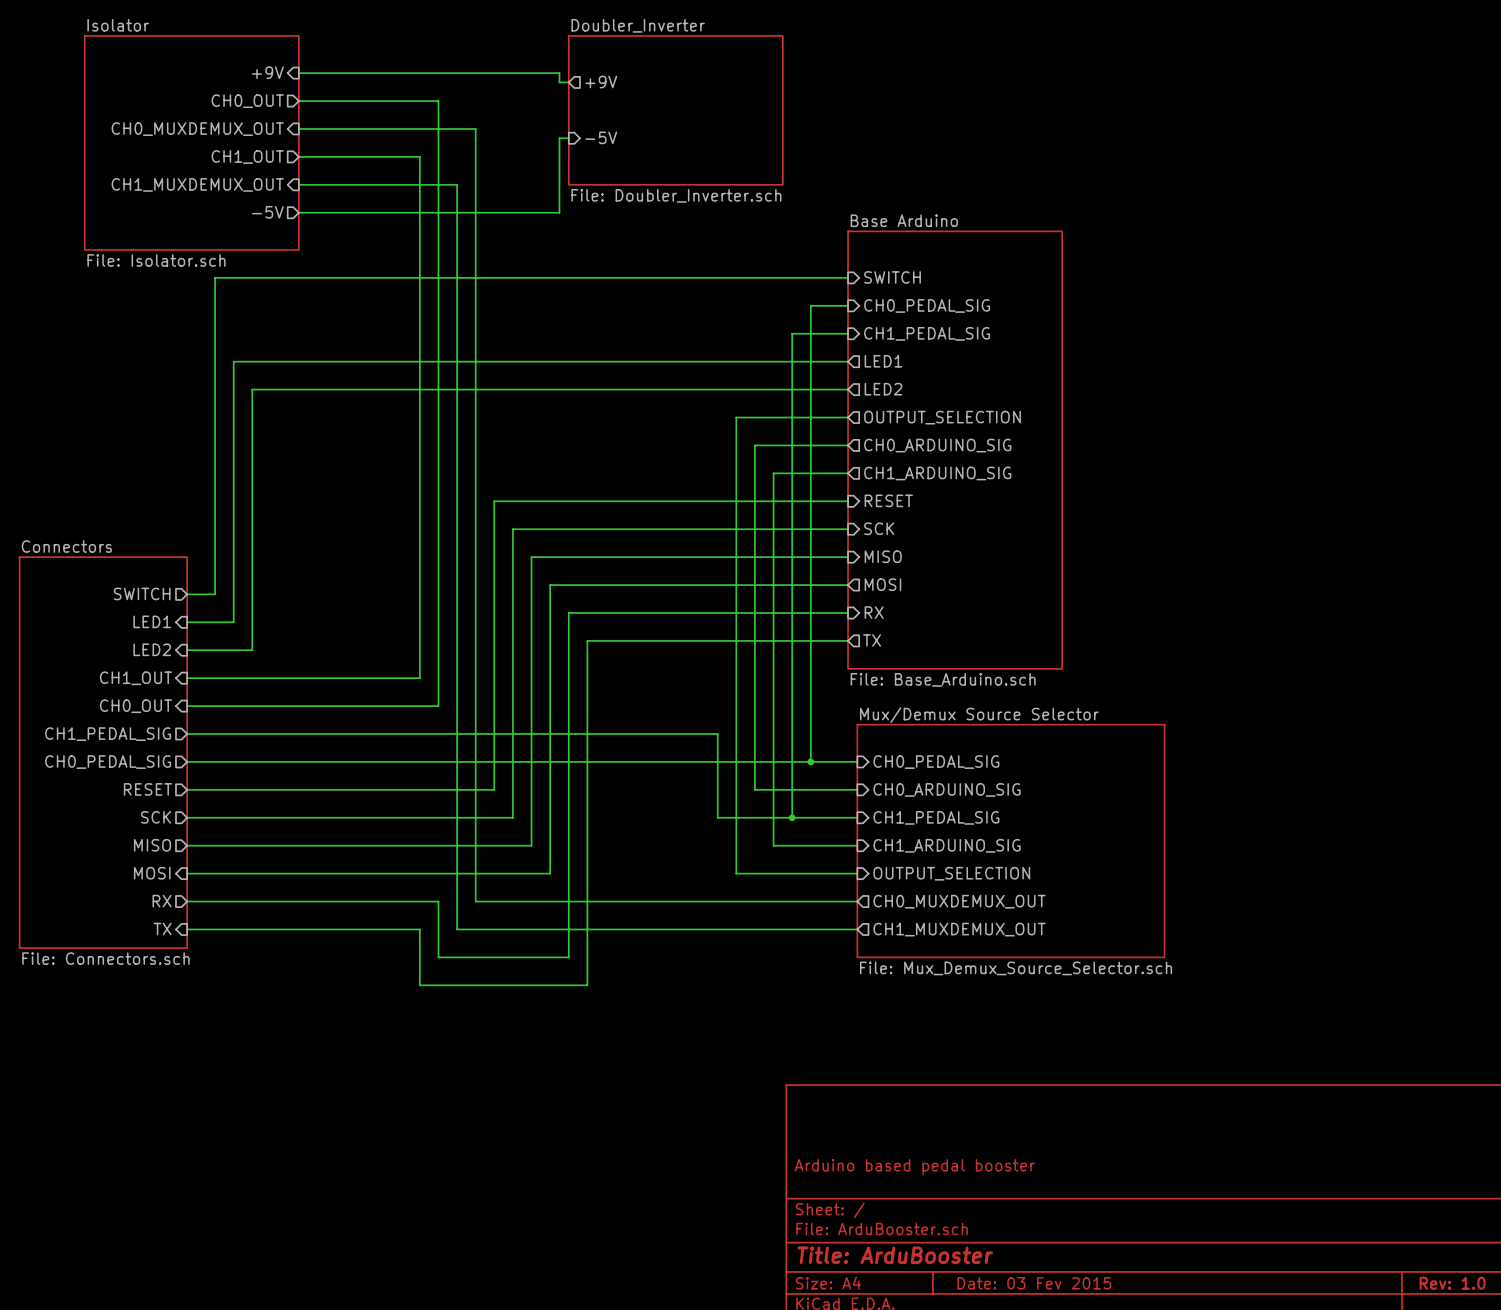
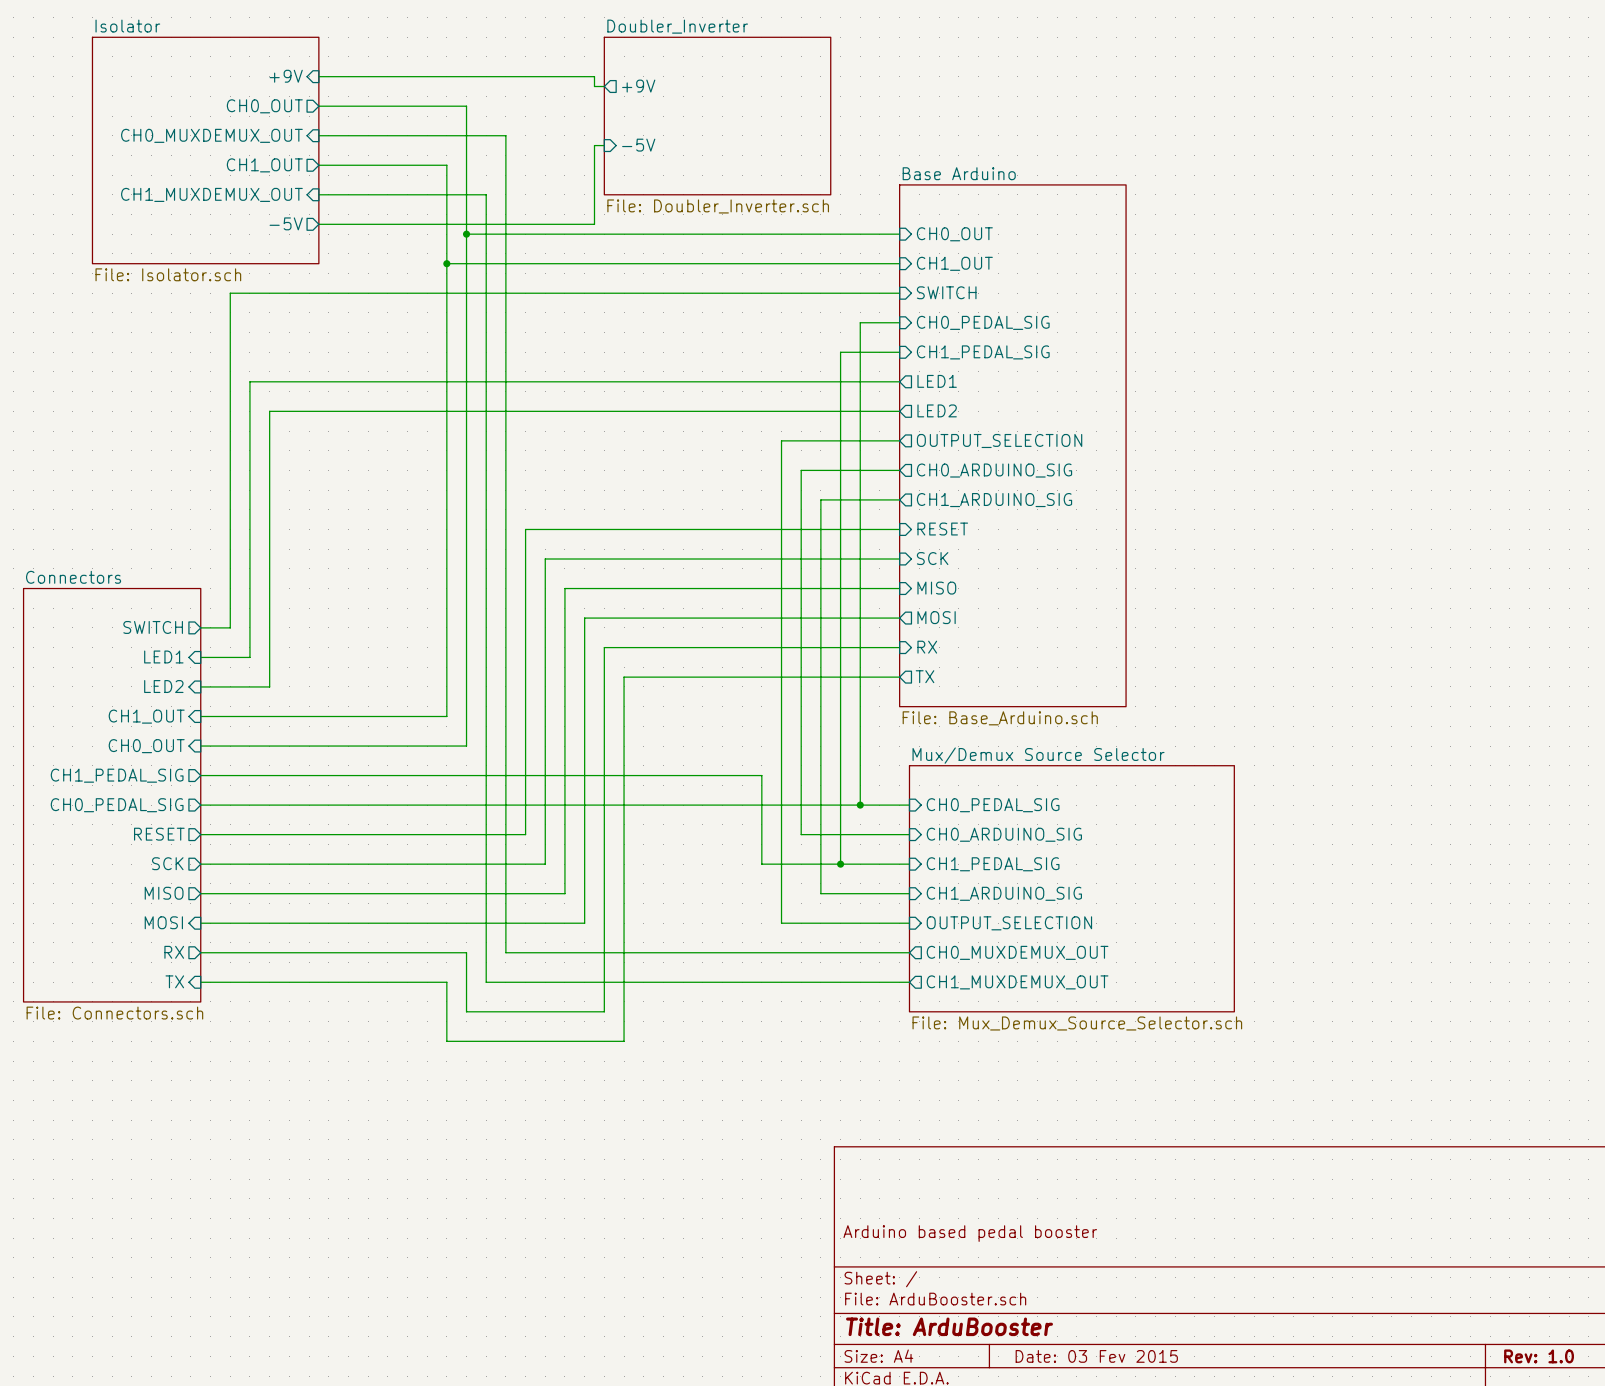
wire: none -> (466, 234) (899, 234)
junction: none -> (466, 234)
sheet pin: none -> CH0_OUT (954, 234)
wire: none -> (446, 263) (899, 263)
junction: none -> (446, 263)
sheet pin: none -> CH1_OUT (954, 263)
sheet Base Arduino: none -> File: Base_Arduino.sch (1012, 445)
sheet Base Arduino: File: Base_Arduino.sch (955, 450) -> none

